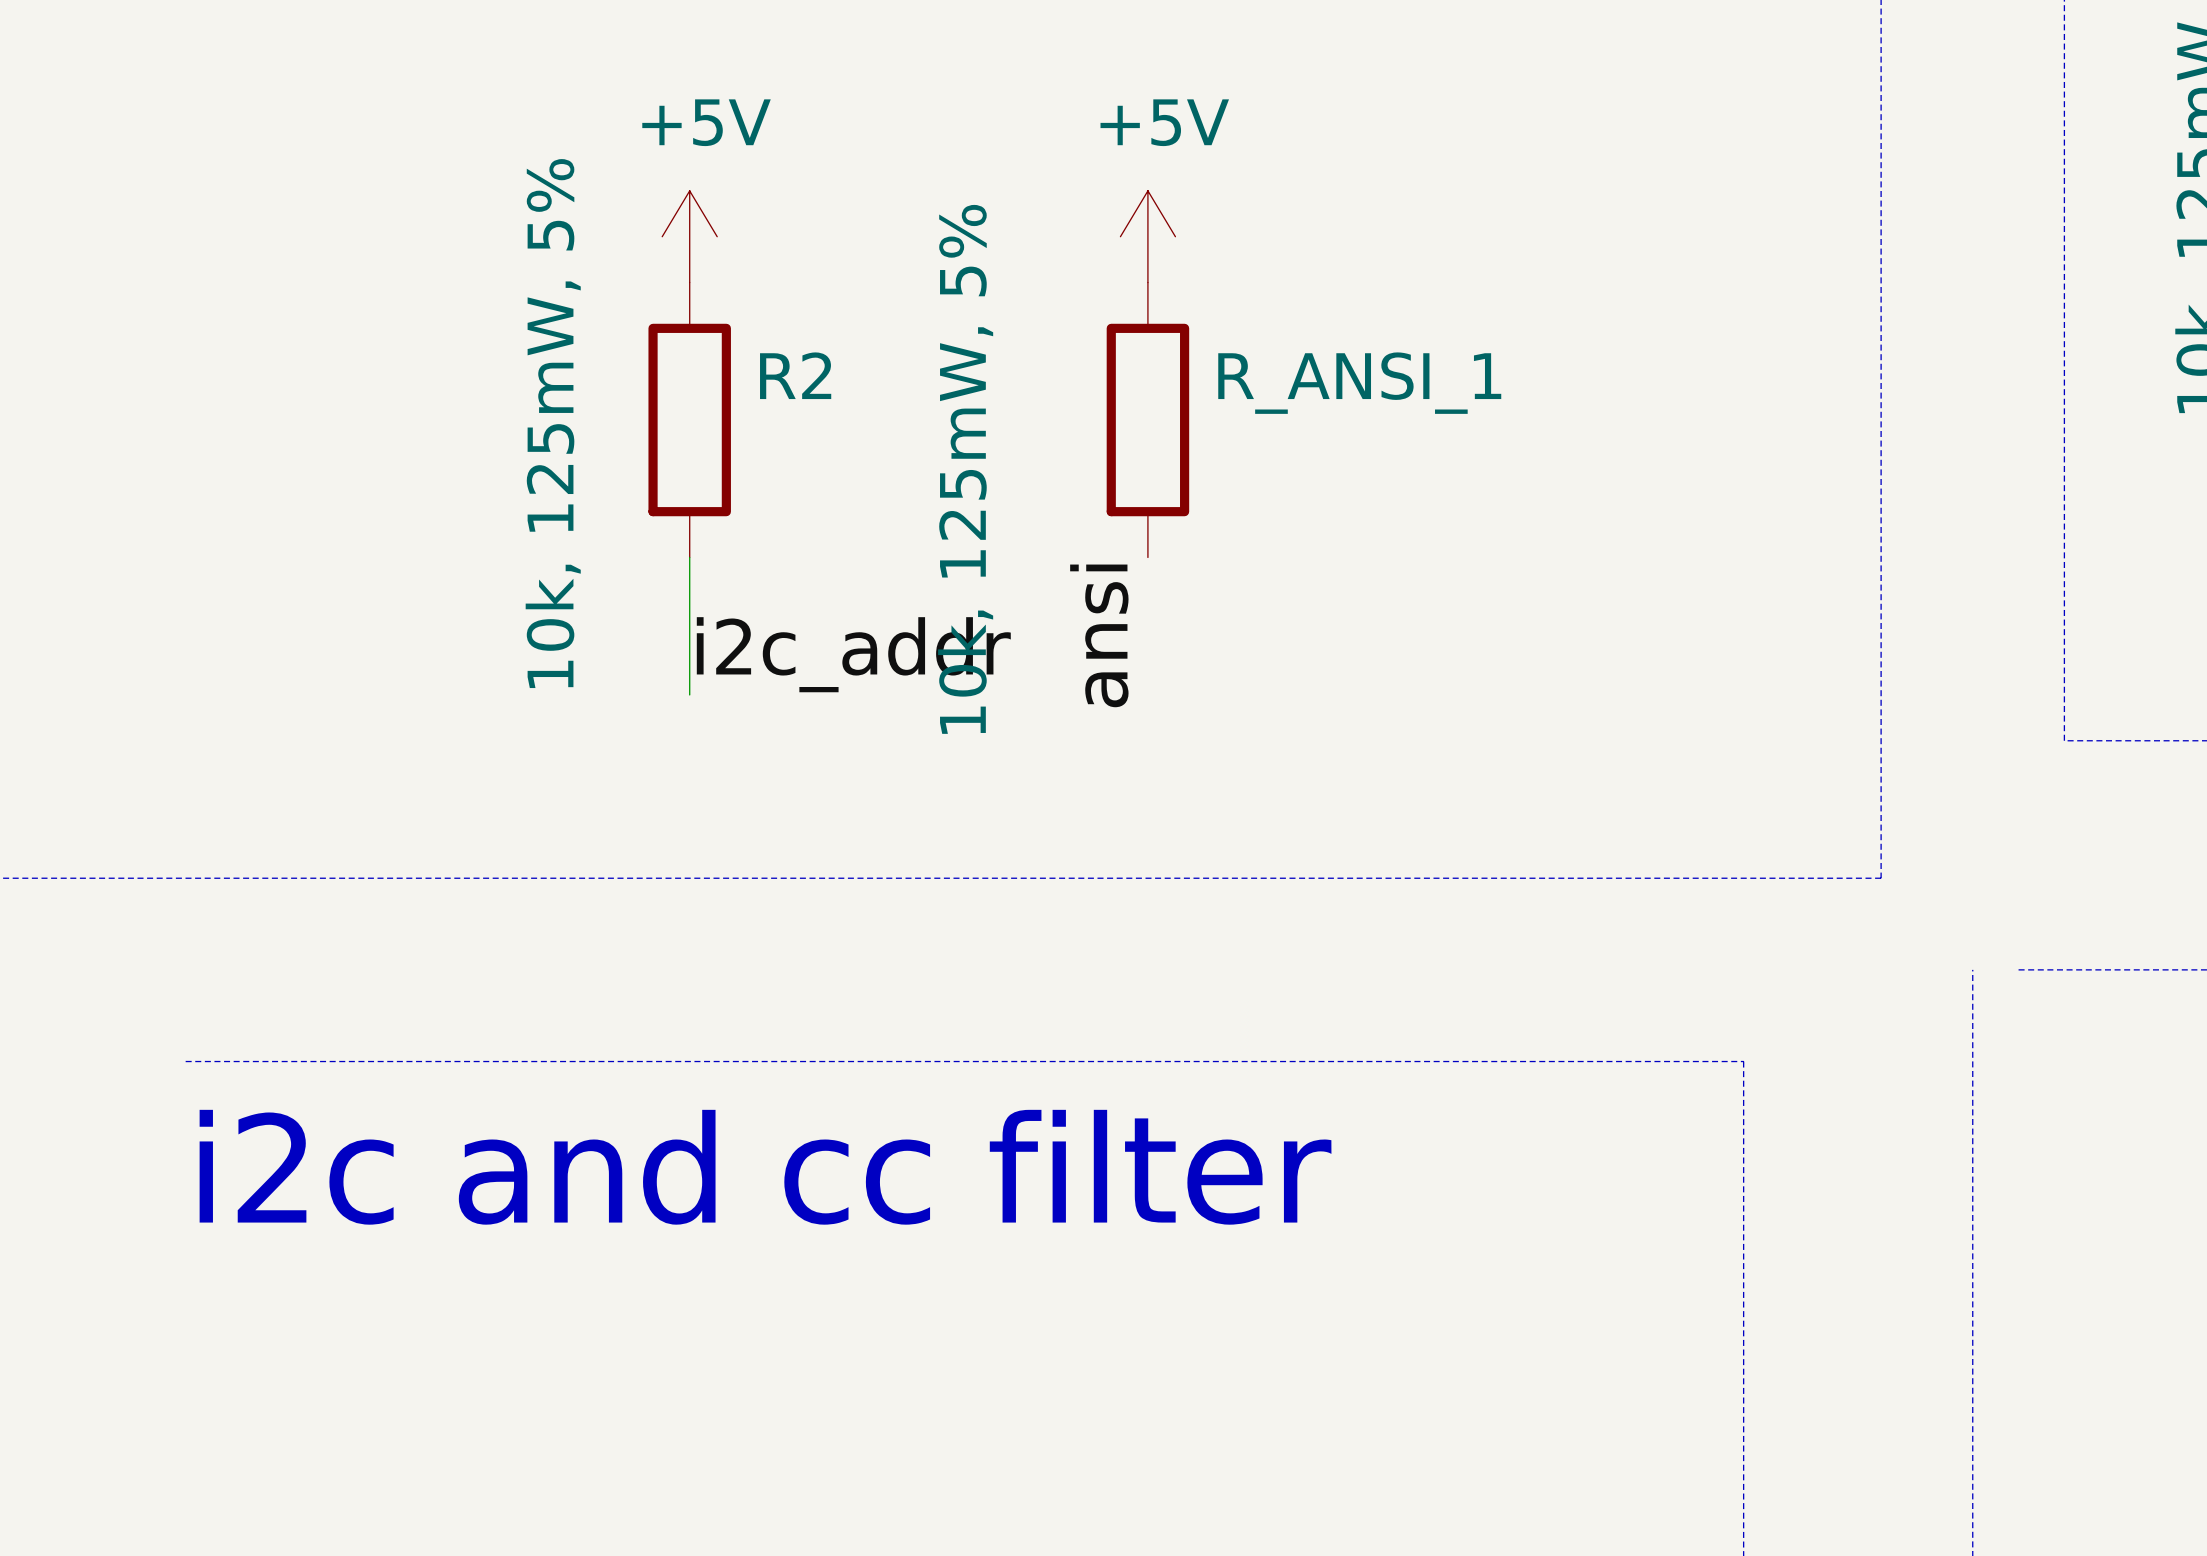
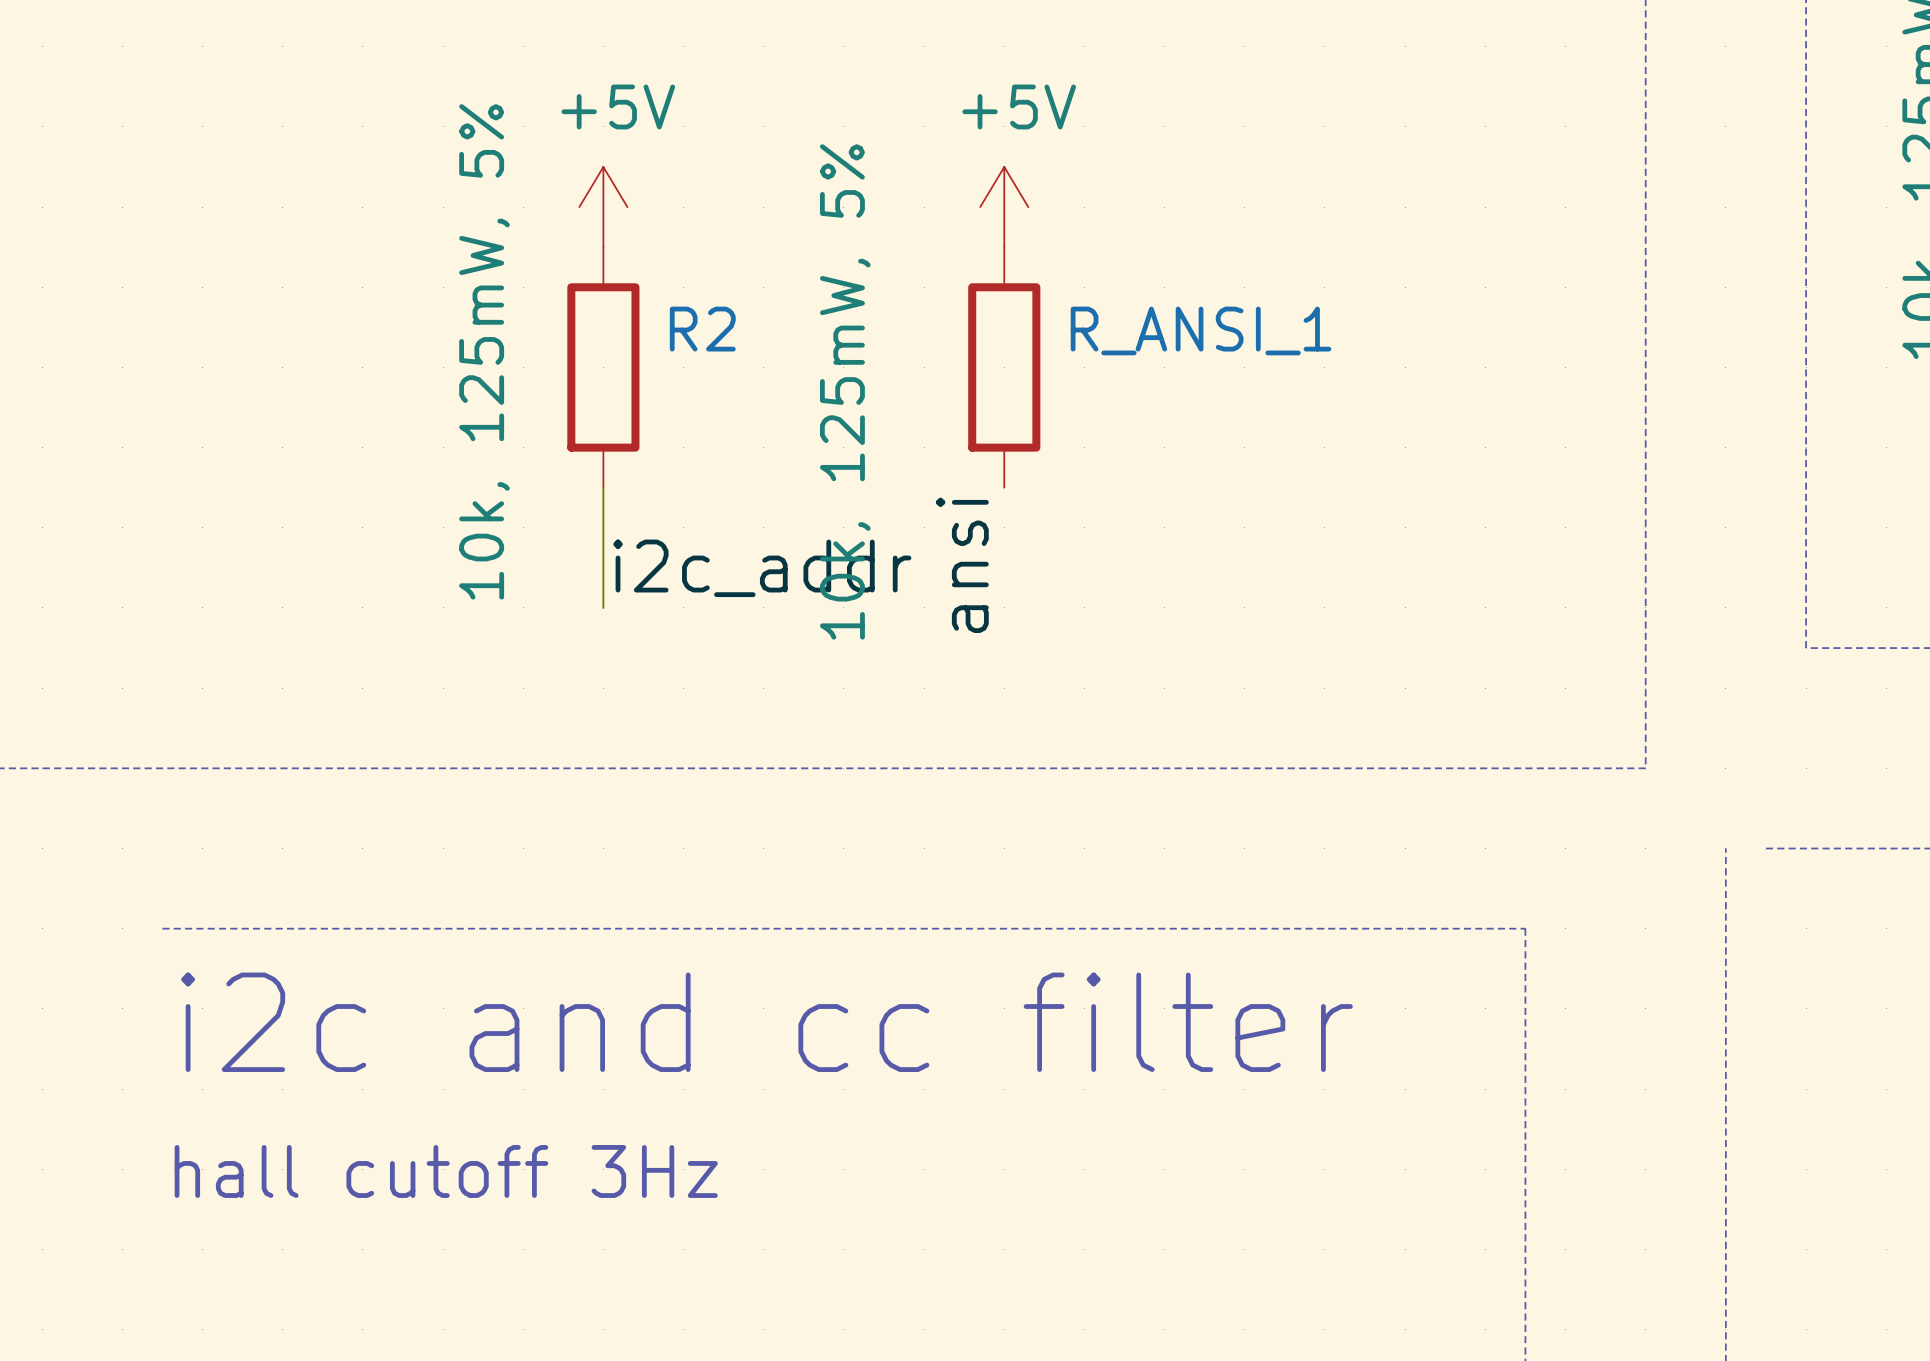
text: none -> hall cutoff 3Hz (446, 1171)

